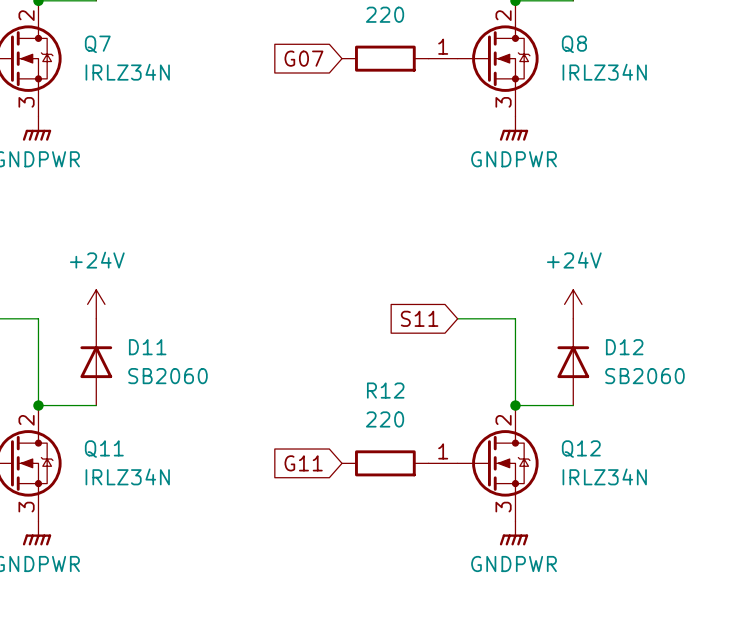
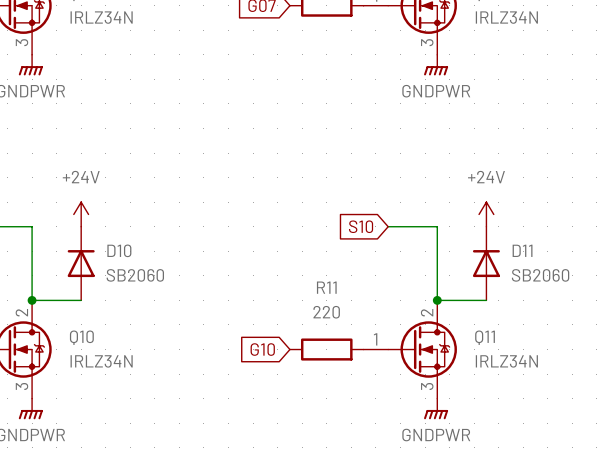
global label: S11 (419, 318) -> S10 (361, 226)
D11 name: D11 (147, 347) -> D10 (119, 250)
D12 name: D12 (624, 347) -> D11 (522, 250)
R12 name: R12 (385, 390) -> R11 (326, 287)
Q11 name: Q11 (104, 449) -> Q10 (81, 337)
Q12 name: Q12 (581, 449) -> Q11 (485, 337)
global label: G11 (303, 463) -> G10 (262, 349)

